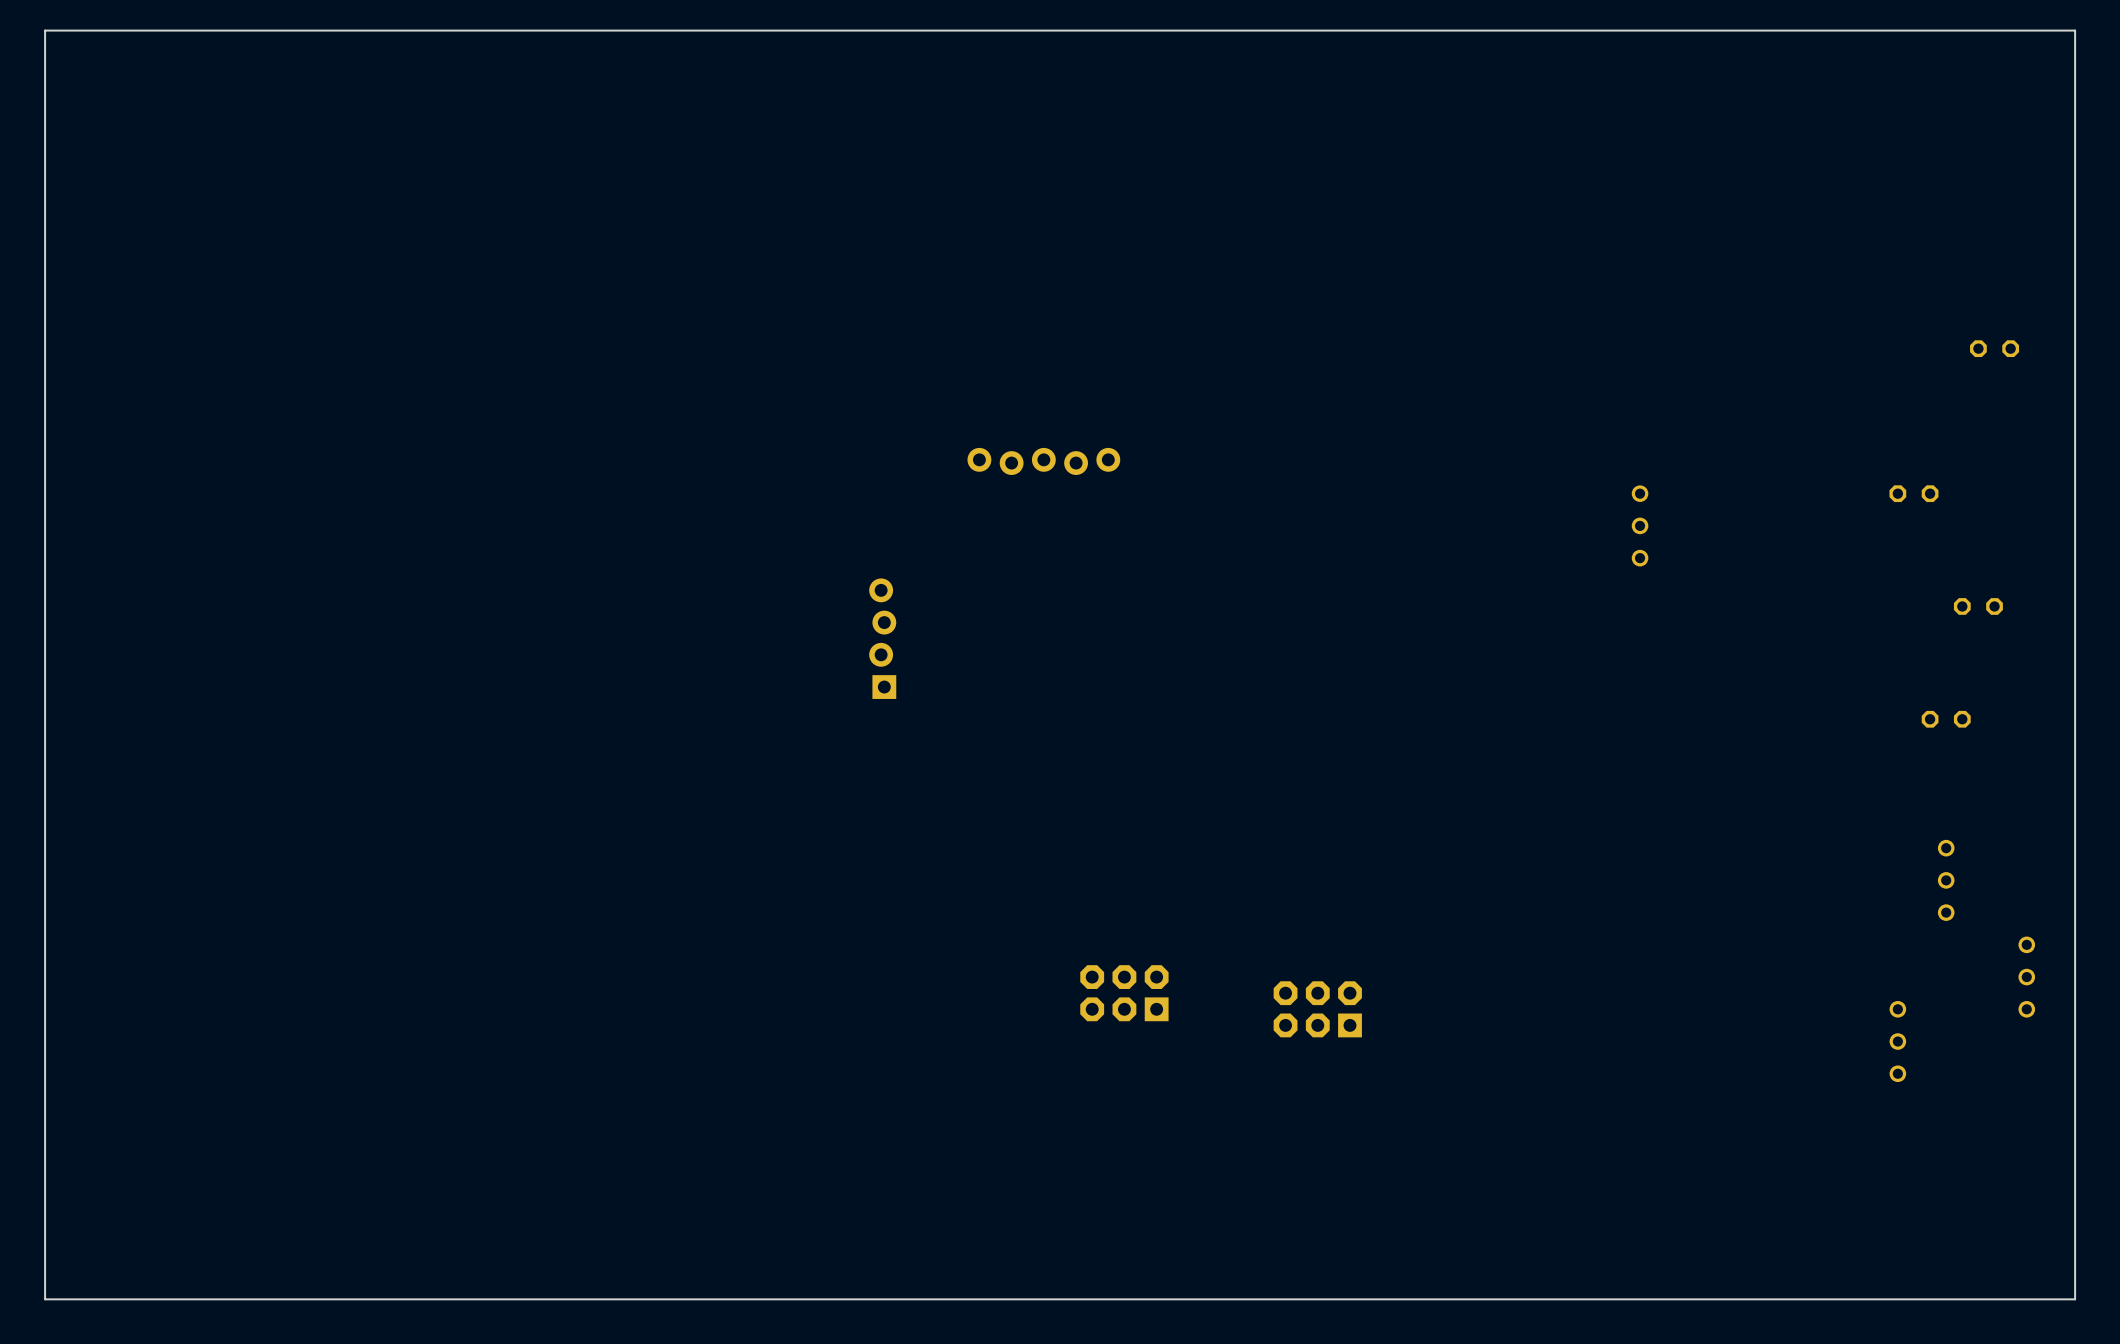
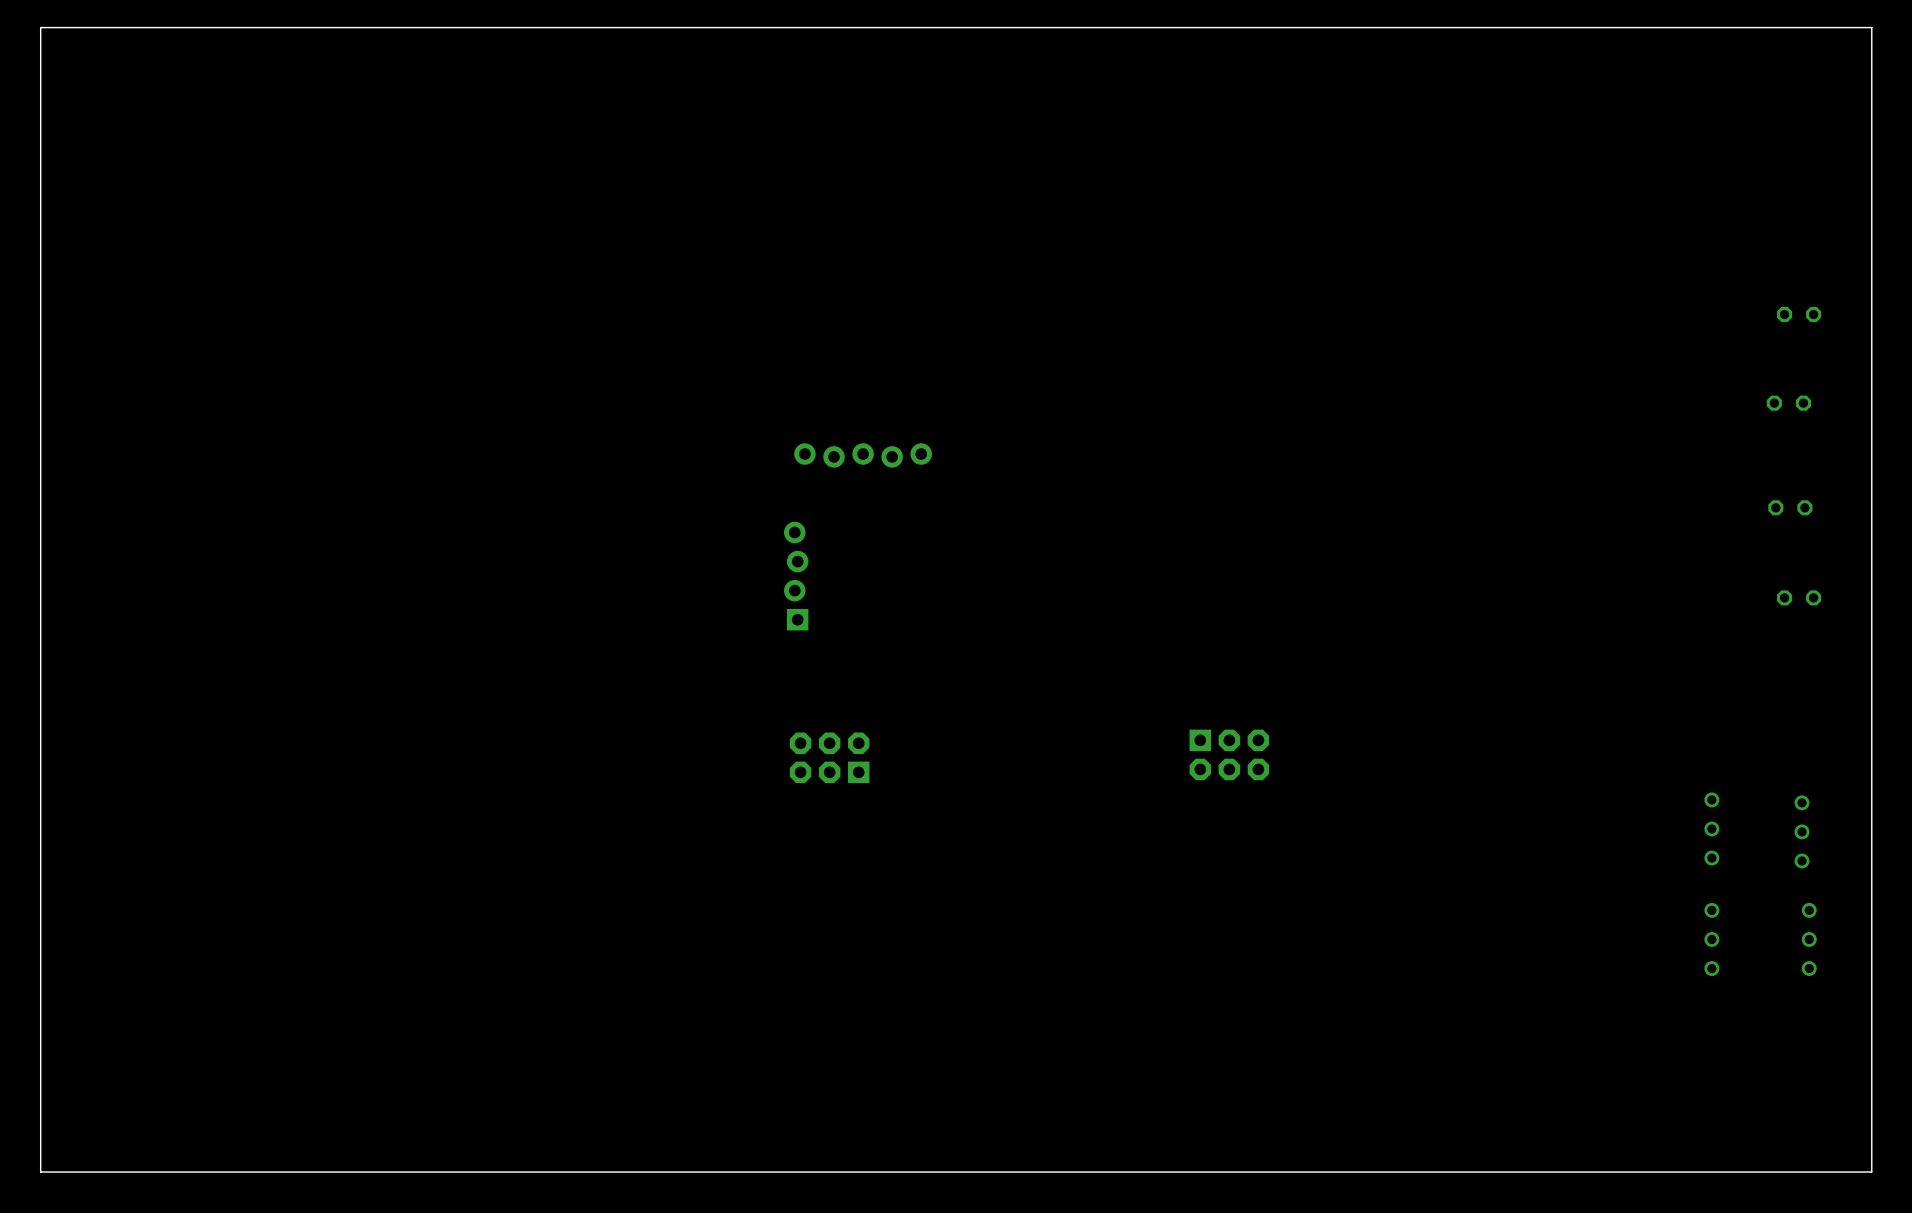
part: none -> (1788, 403)
part position: (1043, 461) -> (863, 455)
part: (1913, 493) -> none
part: (1640, 525) -> none
part: none -> (1790, 507)
part: (1978, 606) -> none
part: none -> (1799, 597)
part: (1946, 719) -> none
part: none -> (1229, 754)
part: none -> (829, 757)
part: (1946, 880) -> none
part: none -> (1711, 829)
part: none -> (1802, 831)
part: (2026, 977) -> none
part: (1124, 993) -> none
part: (1317, 1009) -> none
part: none -> (1809, 939)

